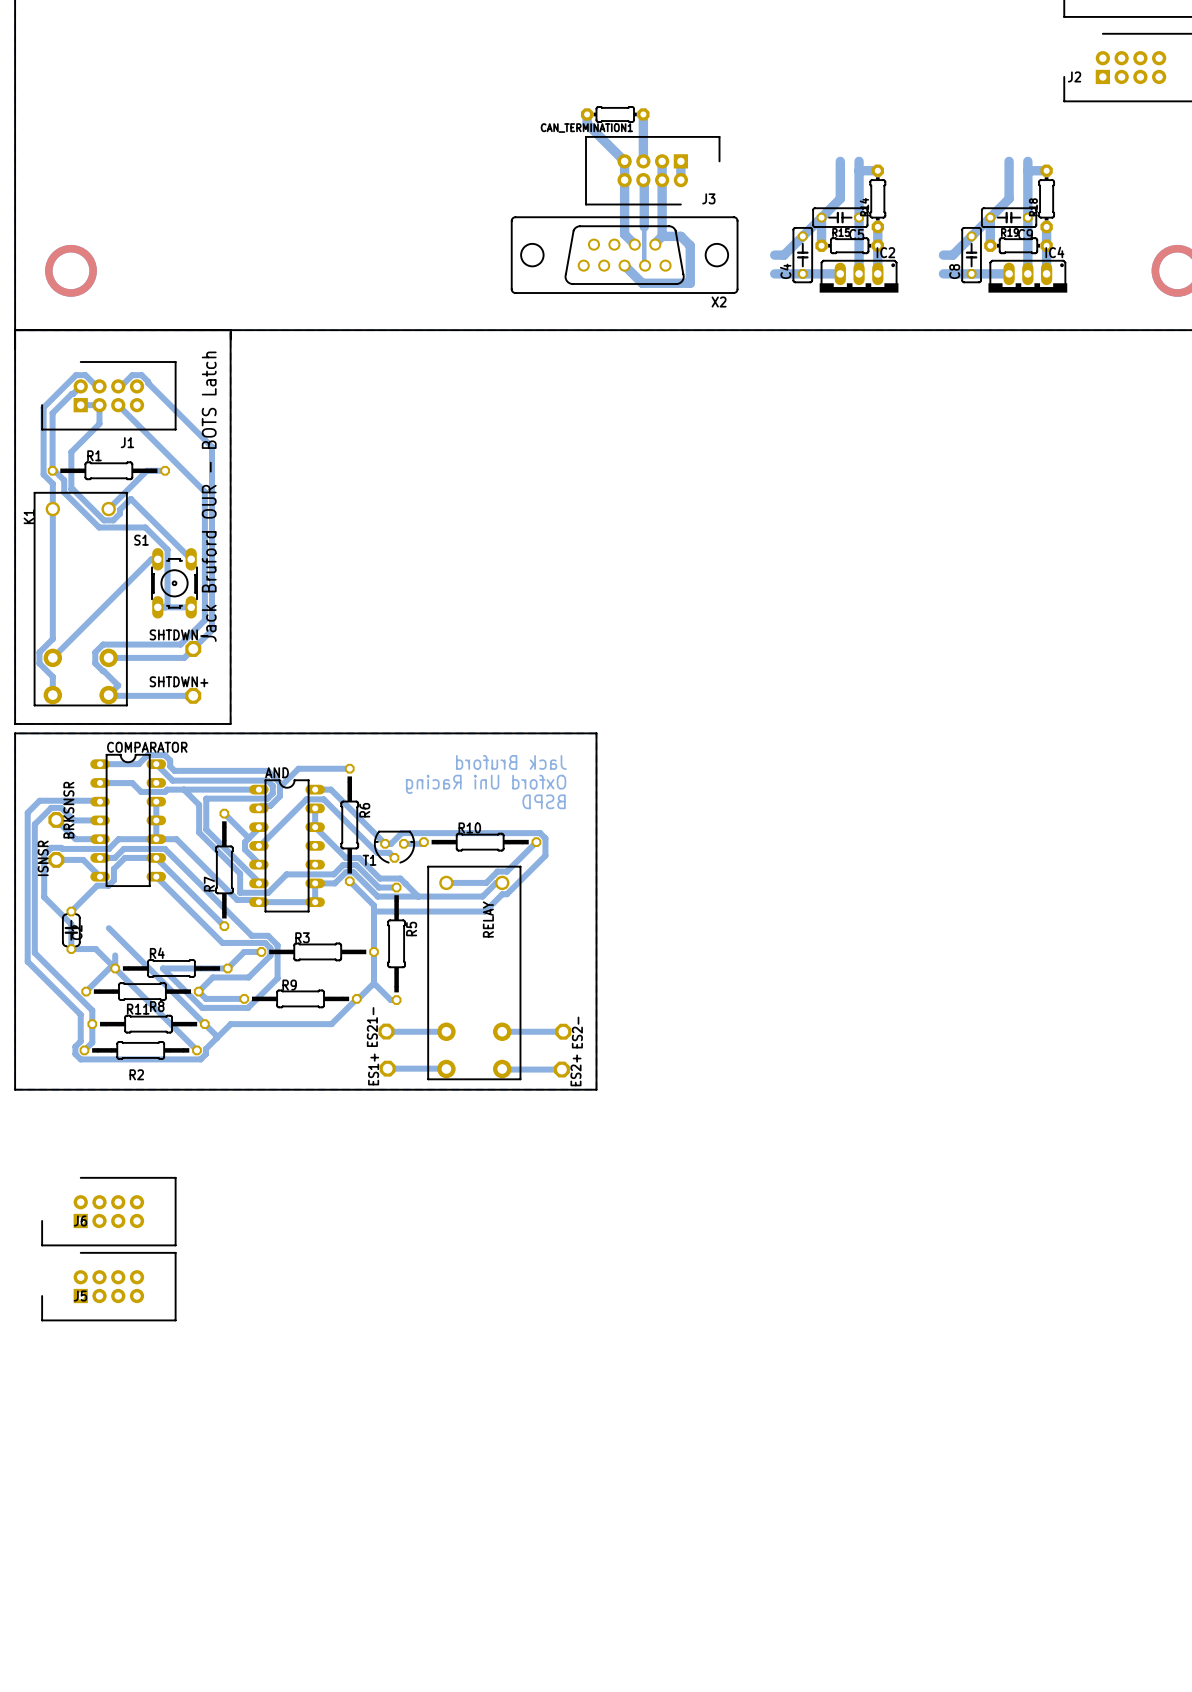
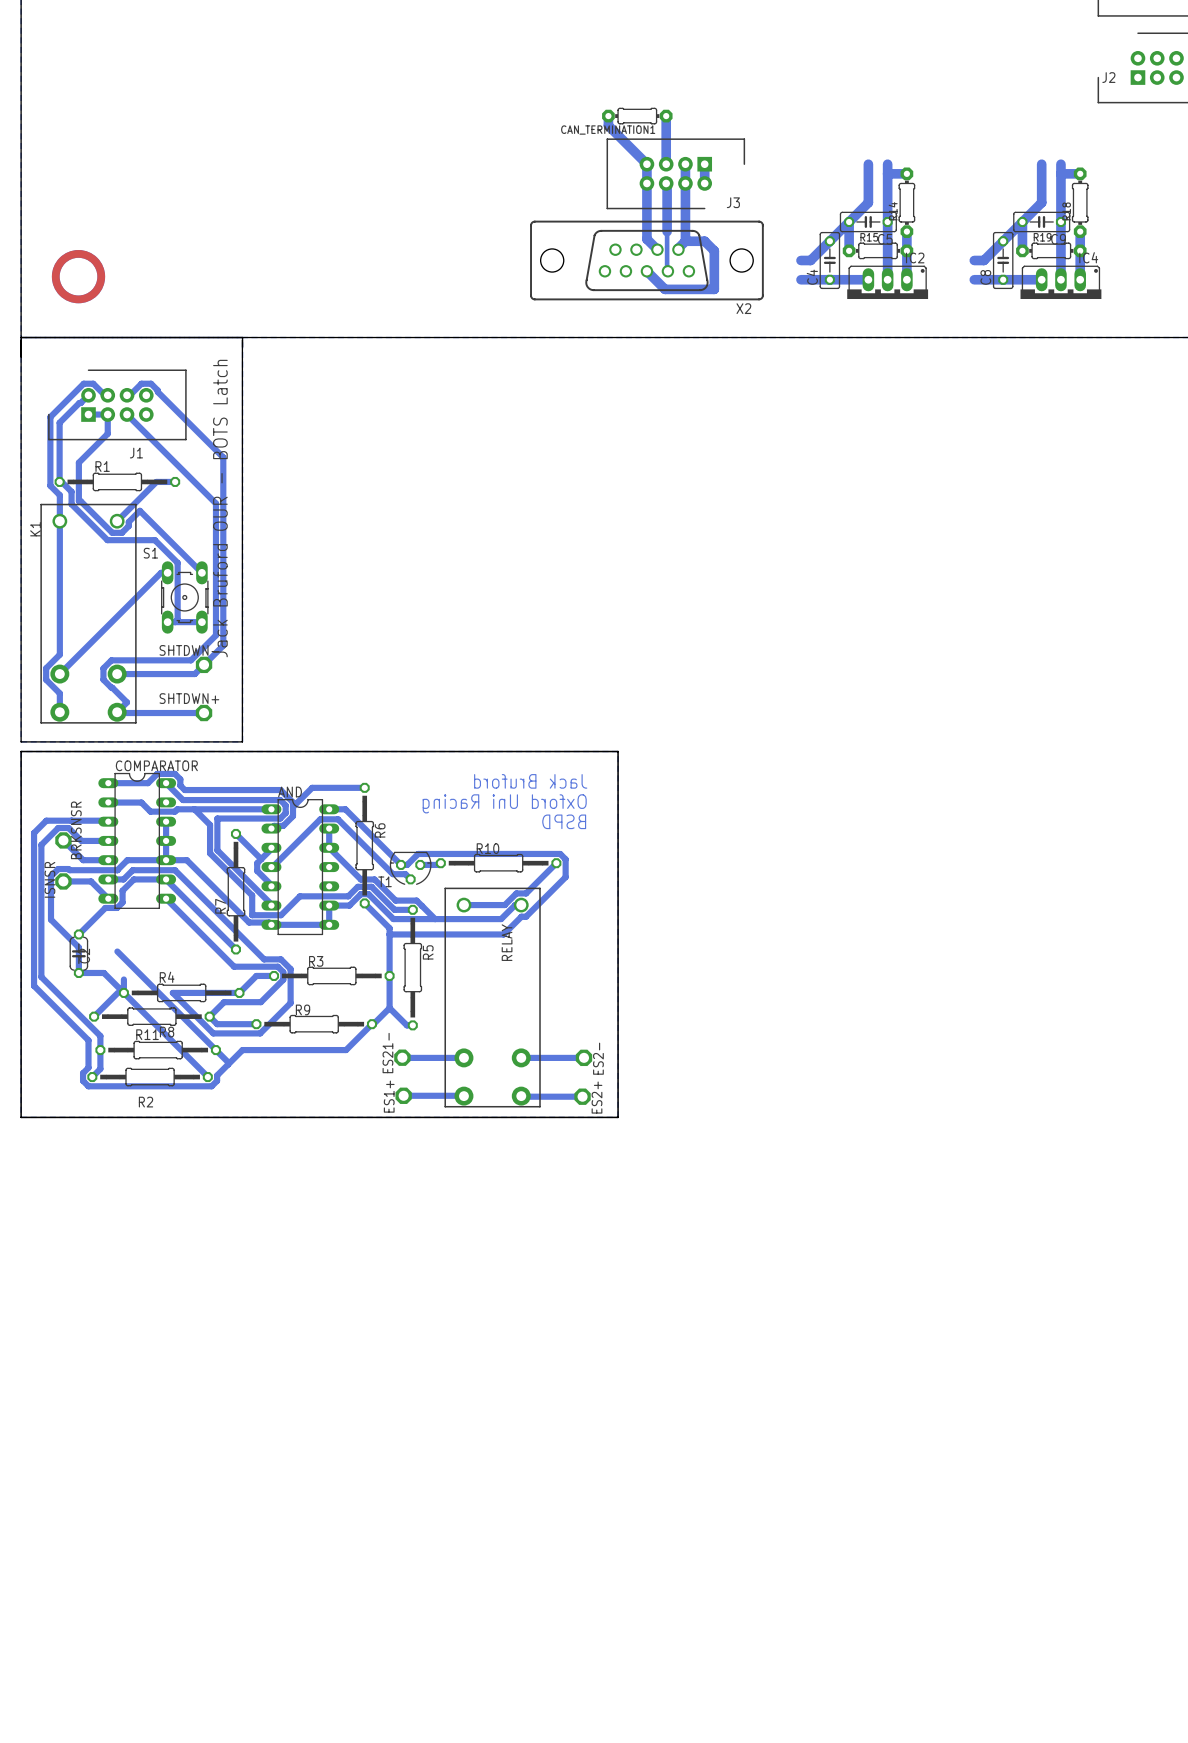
J6: (108, 1211) -> none
J5: (108, 1286) -> none

